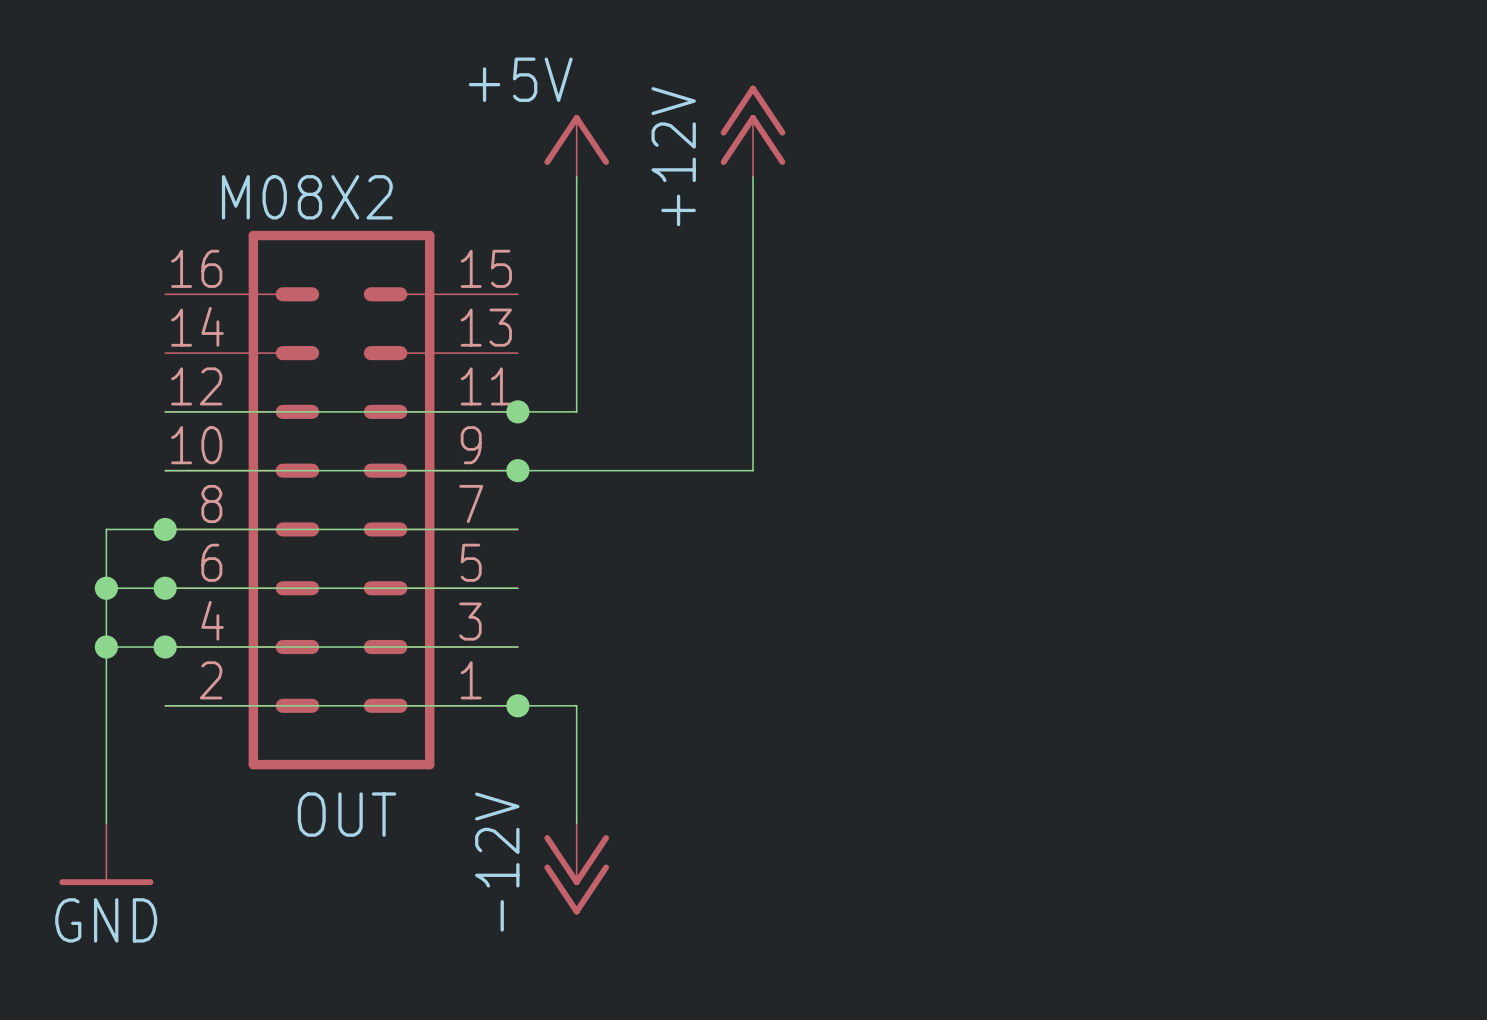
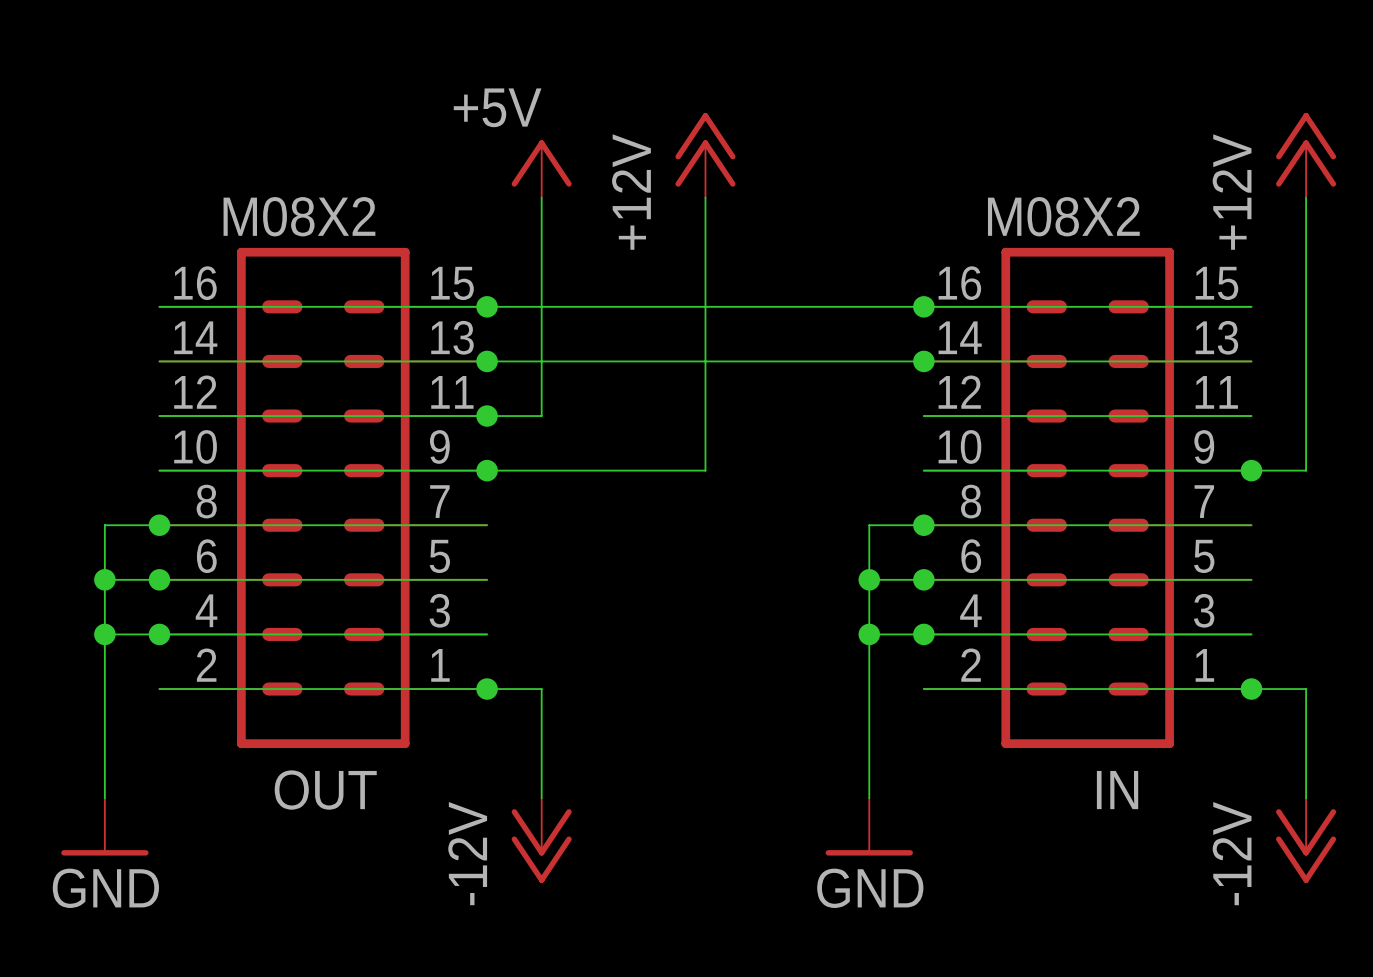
power symbol: none -> +12V (1306, 155)
wire: none -> (1306, 197) (1306, 470) (923, 470)
wire: none -> (159, 306) (1251, 306)
junction: none -> (487, 306)
junction: none -> (923, 306)
wire: none -> (159, 361) (1251, 361)
junction: none -> (487, 361)
junction: none -> (923, 361)
wire: none -> (923, 416) (1251, 416)
junction: none -> (1251, 470)
IN: none -> M08X2 (1087, 497)
junction: none -> (923, 525)
wire: none -> (1251, 525) (869, 525) (869, 798)
wire: none -> (869, 579) (1251, 579)
junction: none -> (869, 579)
junction: none -> (923, 579)
wire: none -> (869, 634) (1251, 634)
junction: none -> (869, 634)
junction: none -> (923, 634)
wire: none -> (923, 689) (1306, 689) (1306, 798)
junction: none -> (1251, 689)
power symbol: none -> GND (869, 826)
power symbol: none -> -12V (1306, 840)

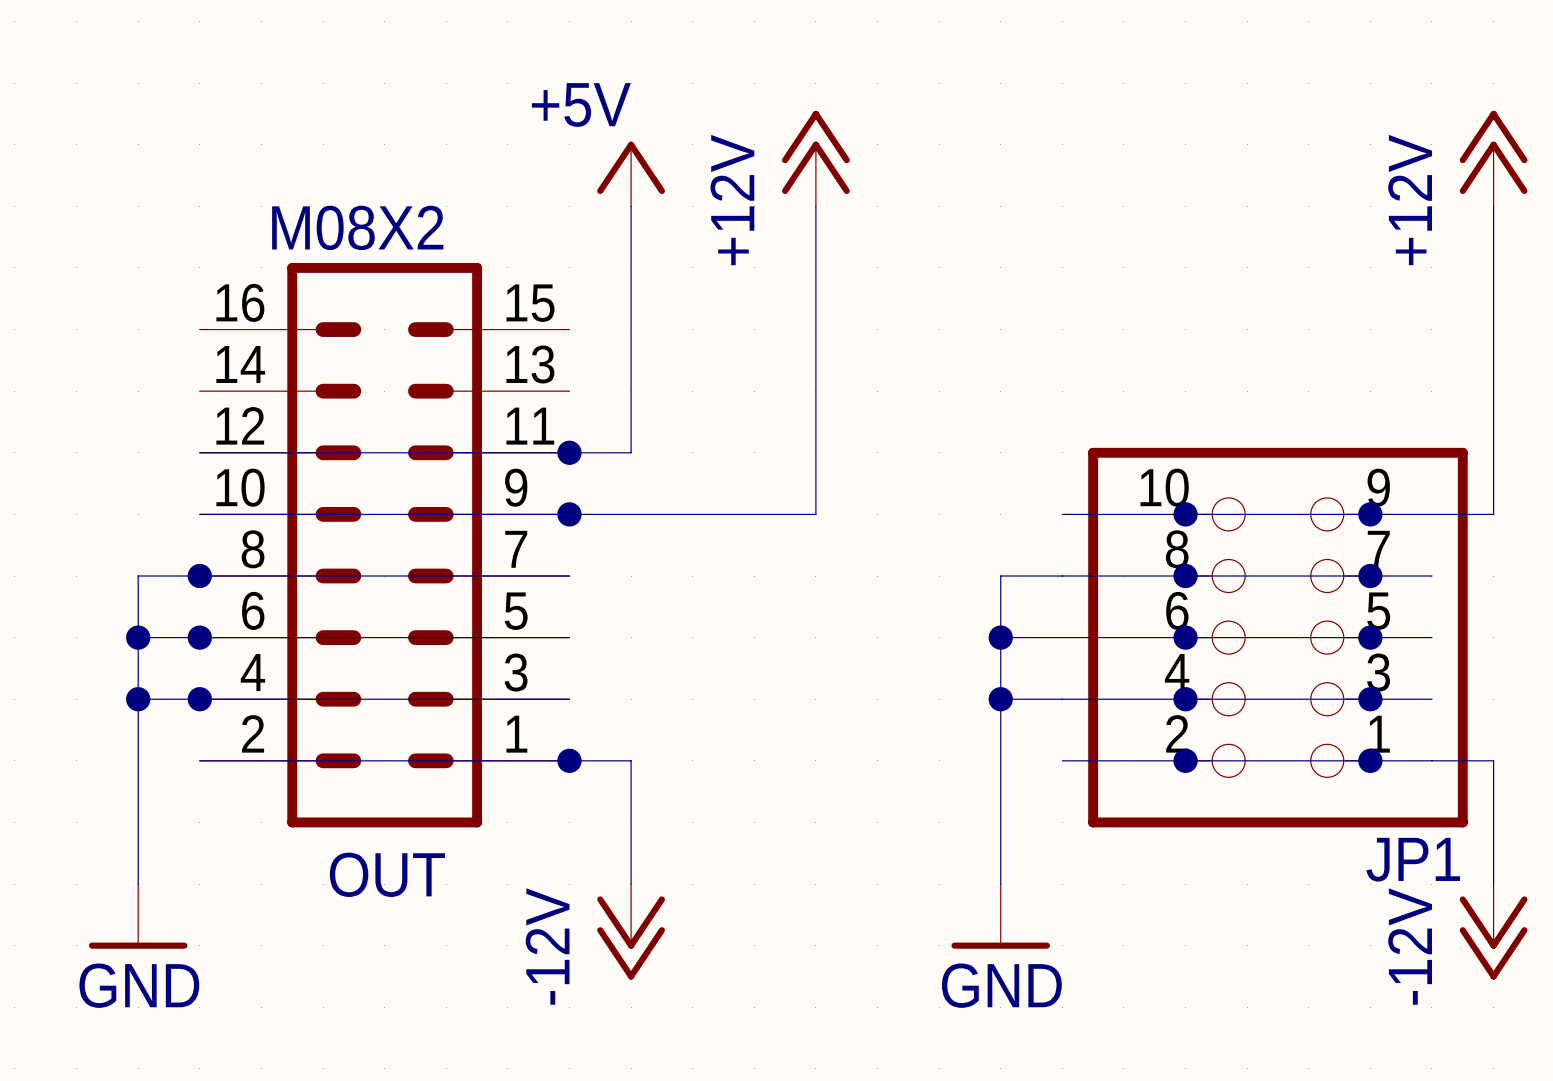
wire: (159, 306) (1251, 306) -> none
junction: (487, 306) -> none
junction: (923, 306) -> none
wire: (159, 361) (1251, 361) -> none
junction: (487, 361) -> none
junction: (923, 361) -> none
junction: none -> (1185, 514)
junction: none -> (1370, 514)
junction: (1251, 470) -> none
IN: M08X2 (1087, 497) -> none
junction: (923, 525) -> none
junction: none -> (1185, 576)
junction: none -> (1370, 576)
junction: (923, 579) -> none
junction: none -> (1185, 637)
JP1: none -> (1277, 637)
junction: none -> (1370, 637)
junction: (923, 634) -> none
junction: none -> (1185, 699)
junction: none -> (1370, 699)
junction: none -> (1185, 760)
junction: none -> (1370, 760)
junction: (1251, 689) -> none

